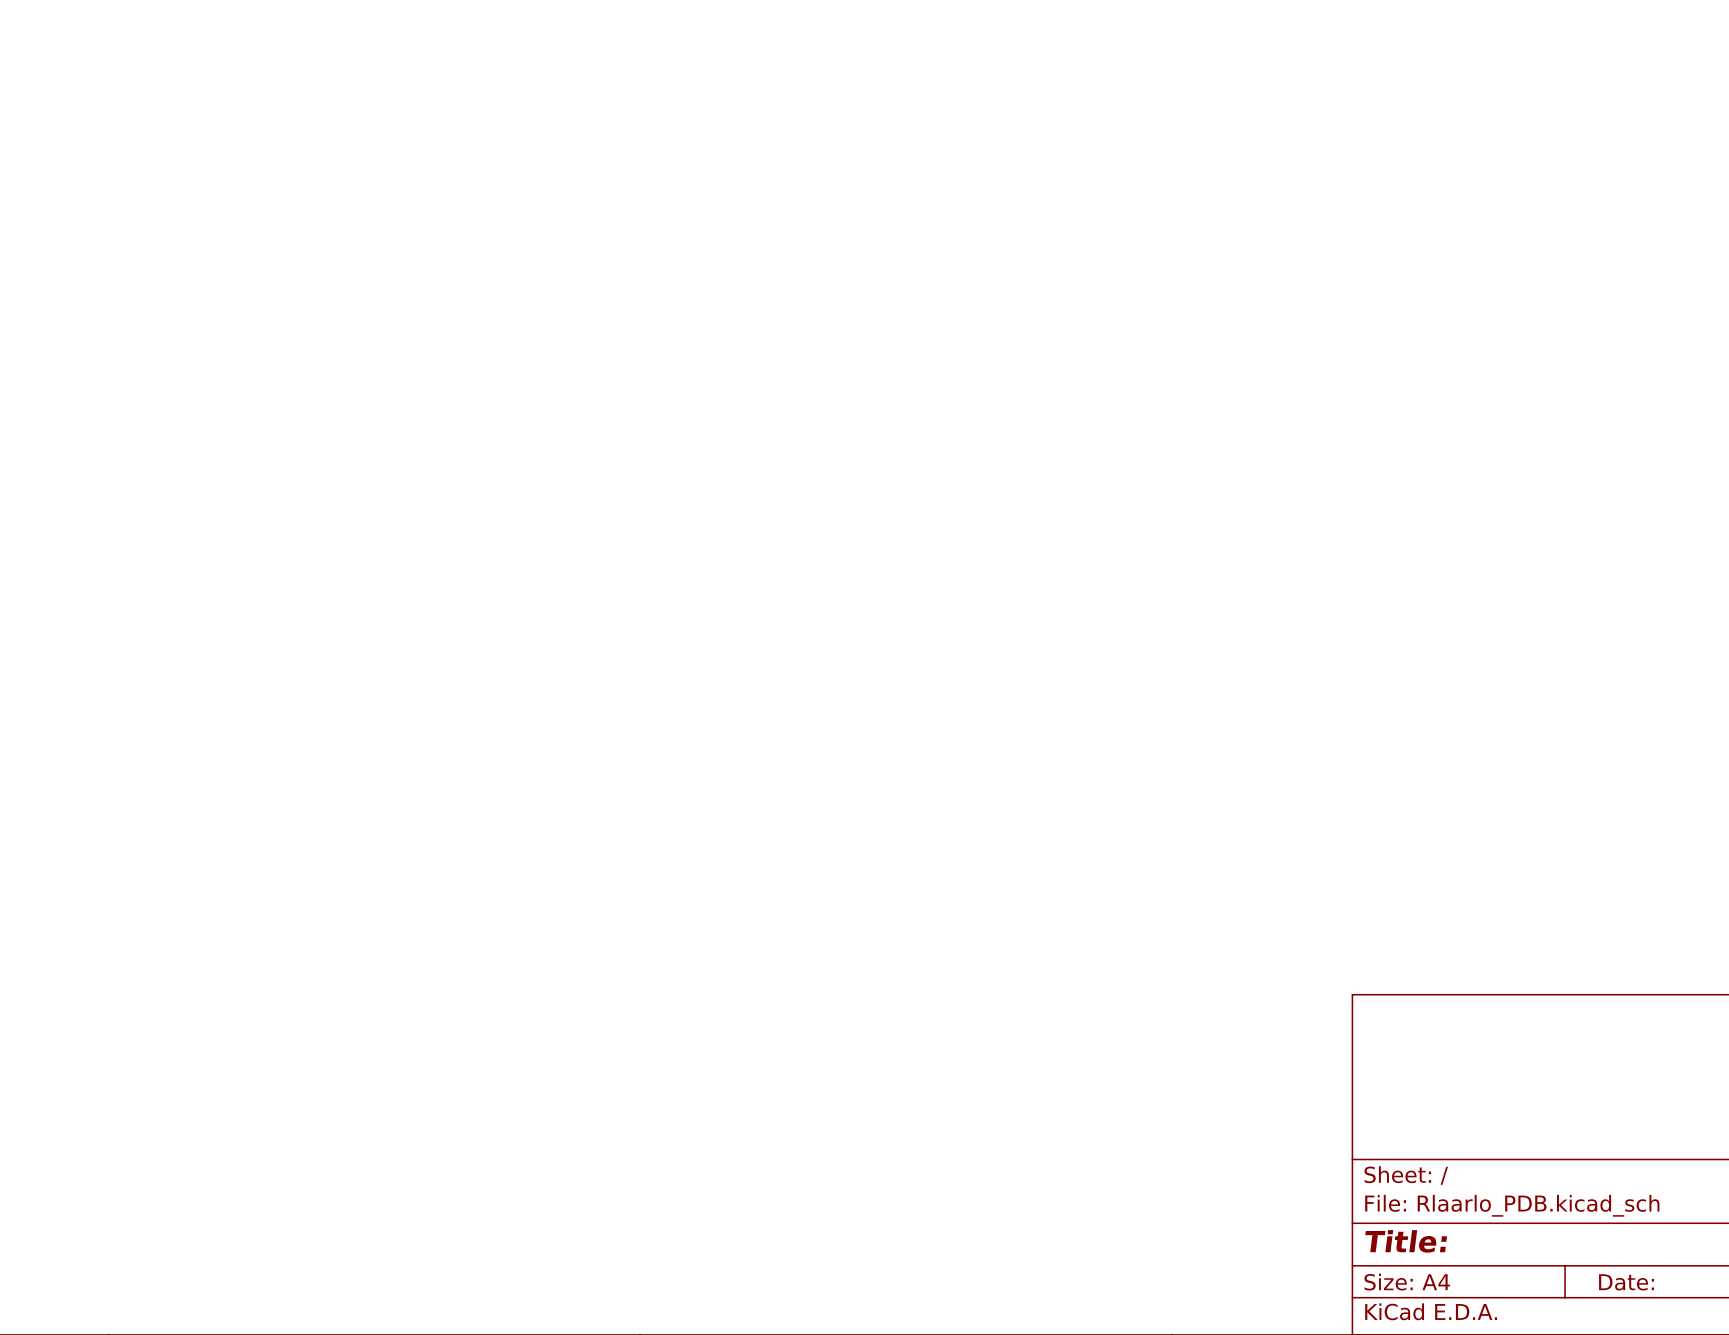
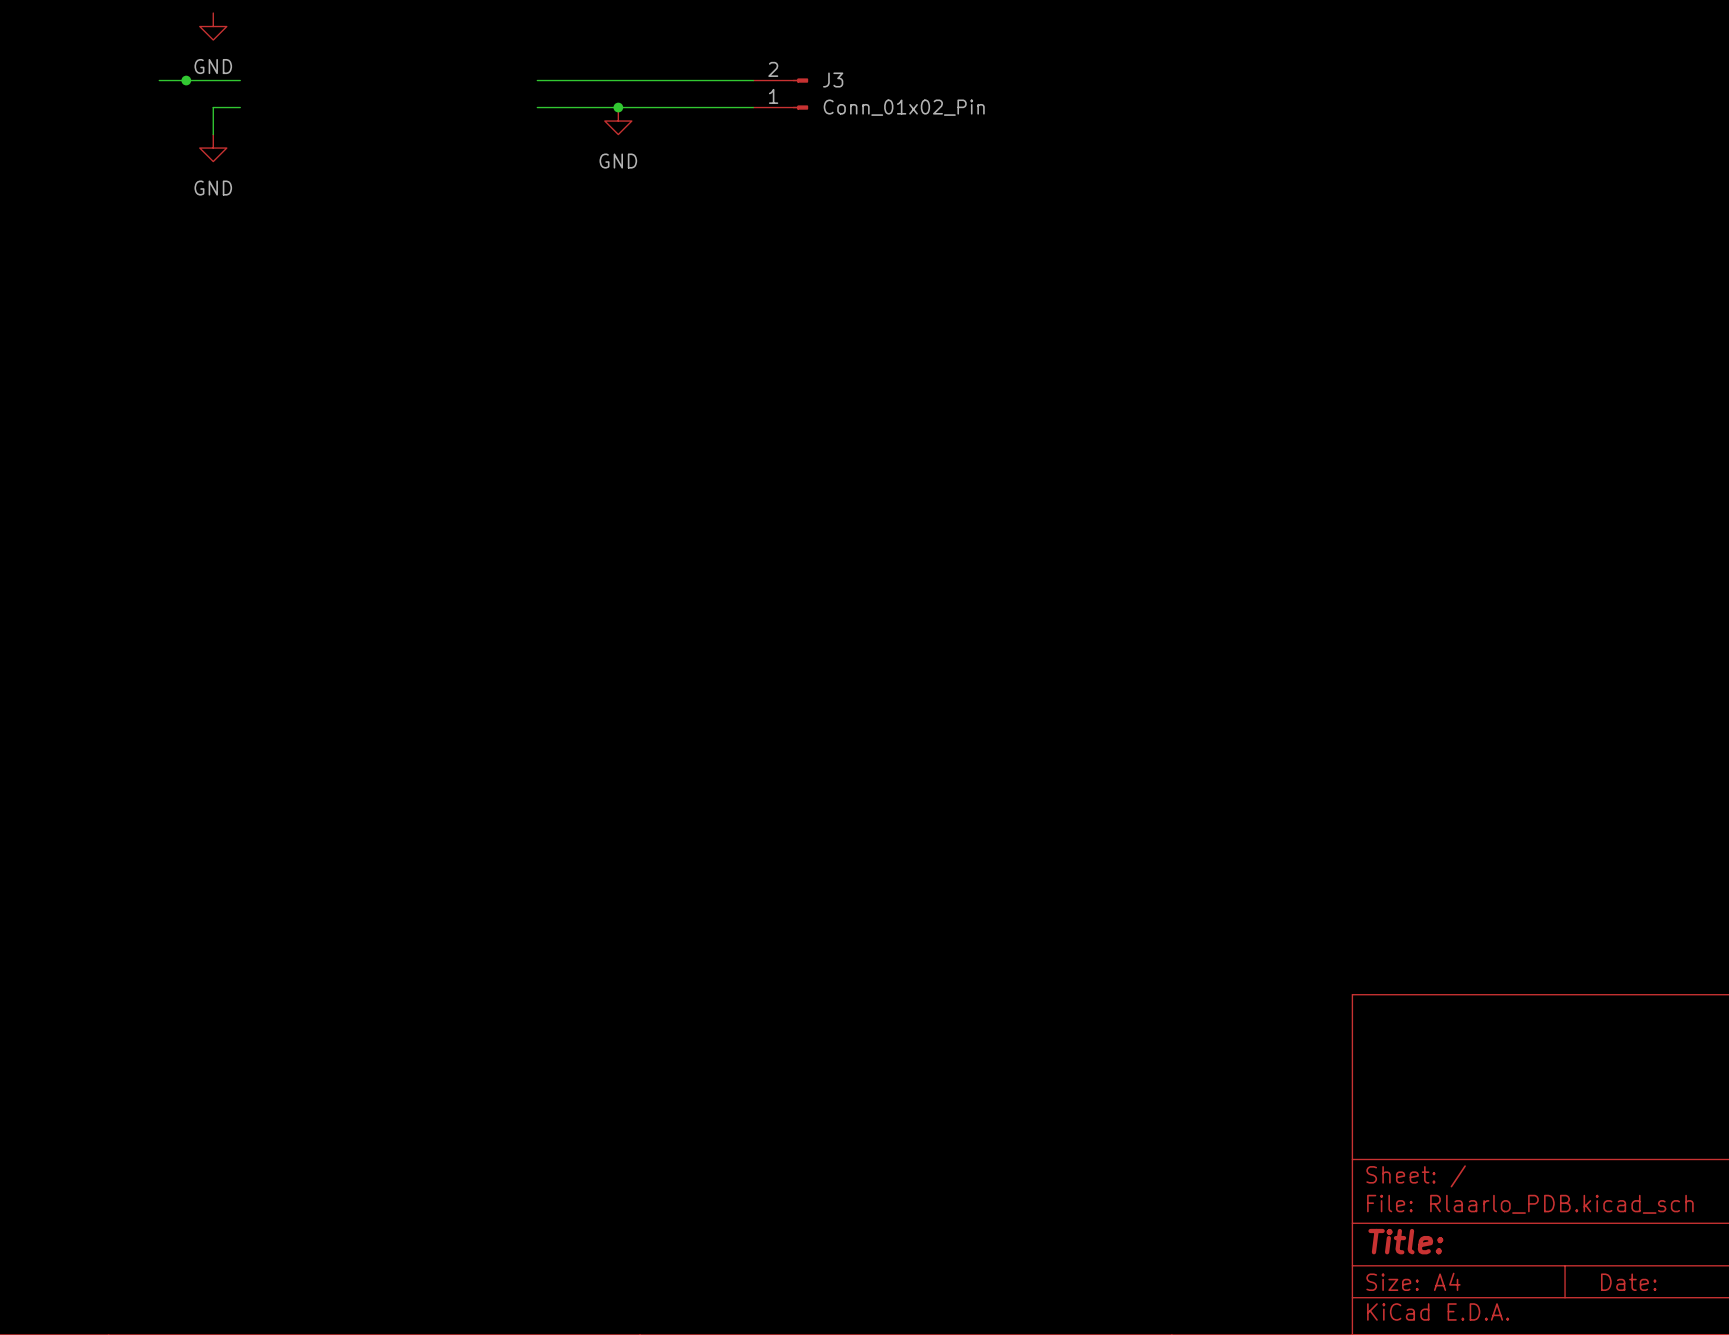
power symbol: none -> GND (213, 26)
wire: none -> (159, 80) (240, 80)
junction: none -> (186, 80)
wire: none -> (537, 80) (753, 80)
J3: none -> Conn_01x02_Pin (780, 94)
wire: none -> (240, 107) (213, 107) (213, 134)
wire: none -> (537, 107) (753, 107)
junction: none -> (618, 107)
power symbol: none -> GND (618, 121)
power symbol: none -> GND (213, 148)

